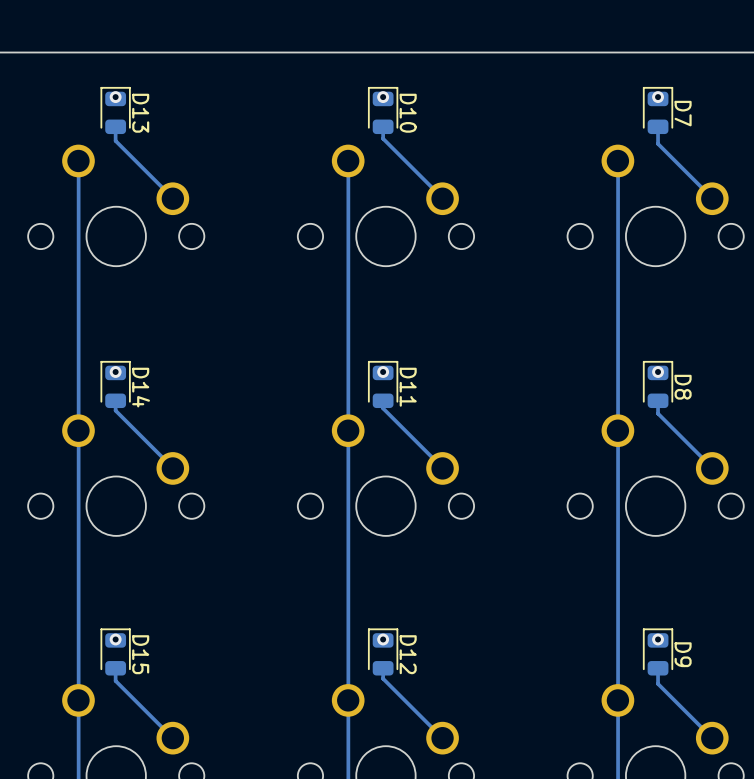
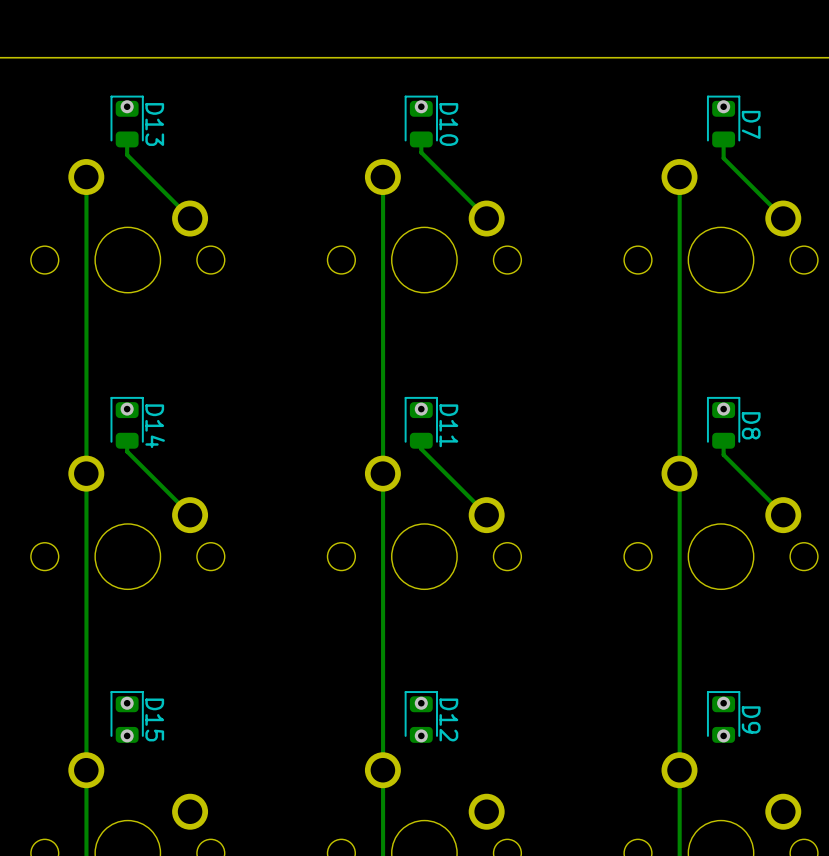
track: (115, 668) (115, 680) (172, 738) -> none
track: (383, 668) (383, 678) (442, 738) -> none
track: (658, 668) (658, 683) (712, 738) -> none
via: none -> (127, 735)
via: none -> (421, 735)
via: none -> (723, 735)

